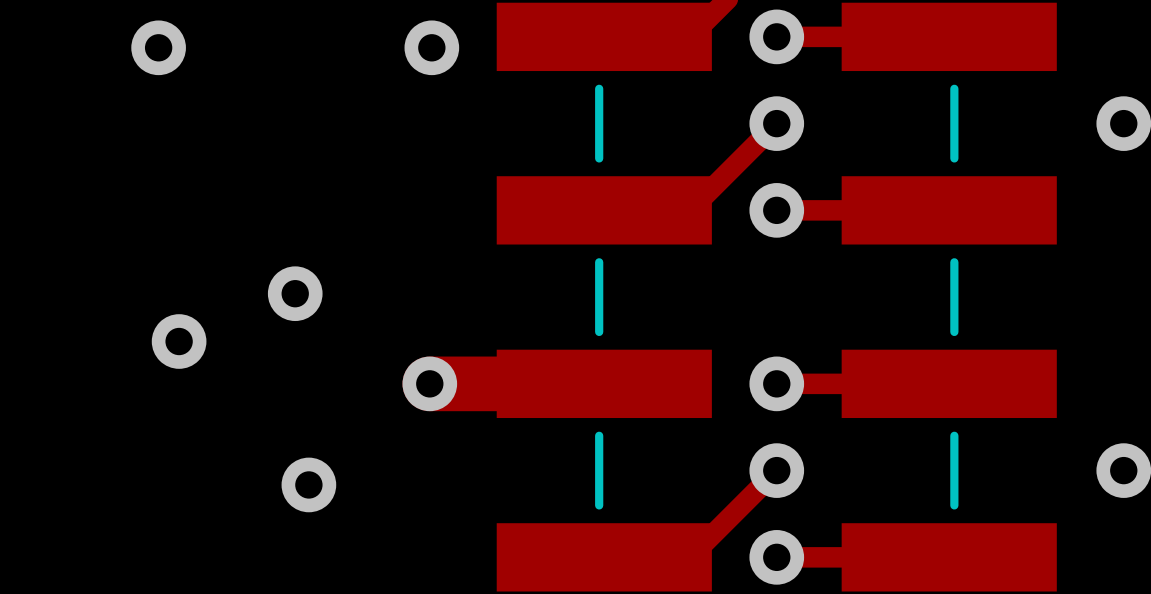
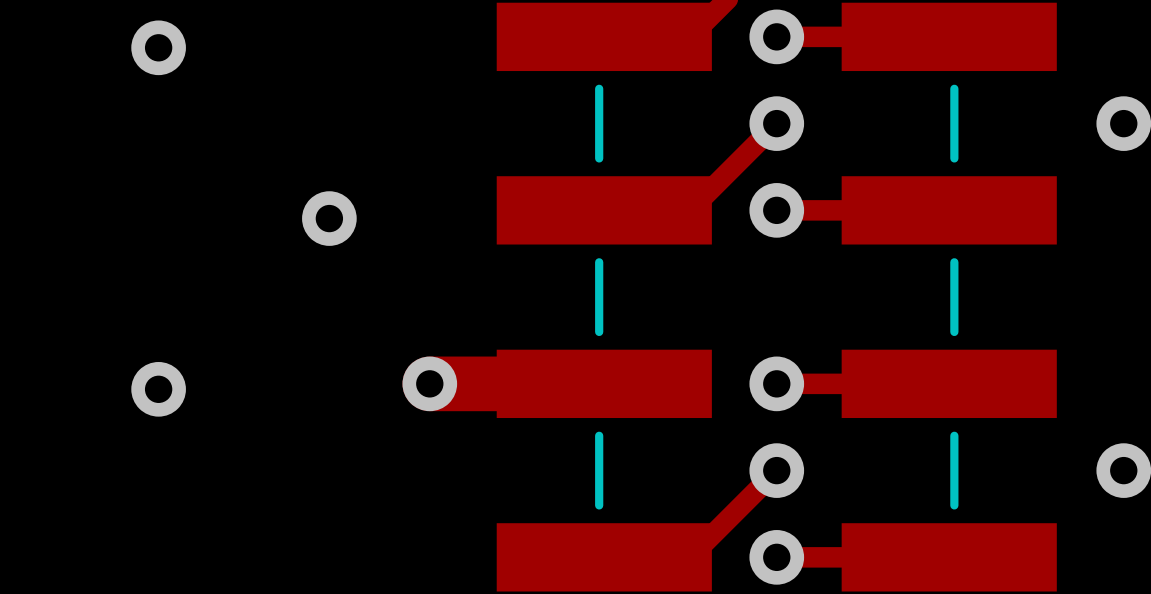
via: (431, 47) -> none
via position: (295, 293) -> (329, 218)
via position: (179, 341) -> (158, 389)
via: (308, 484) -> none

